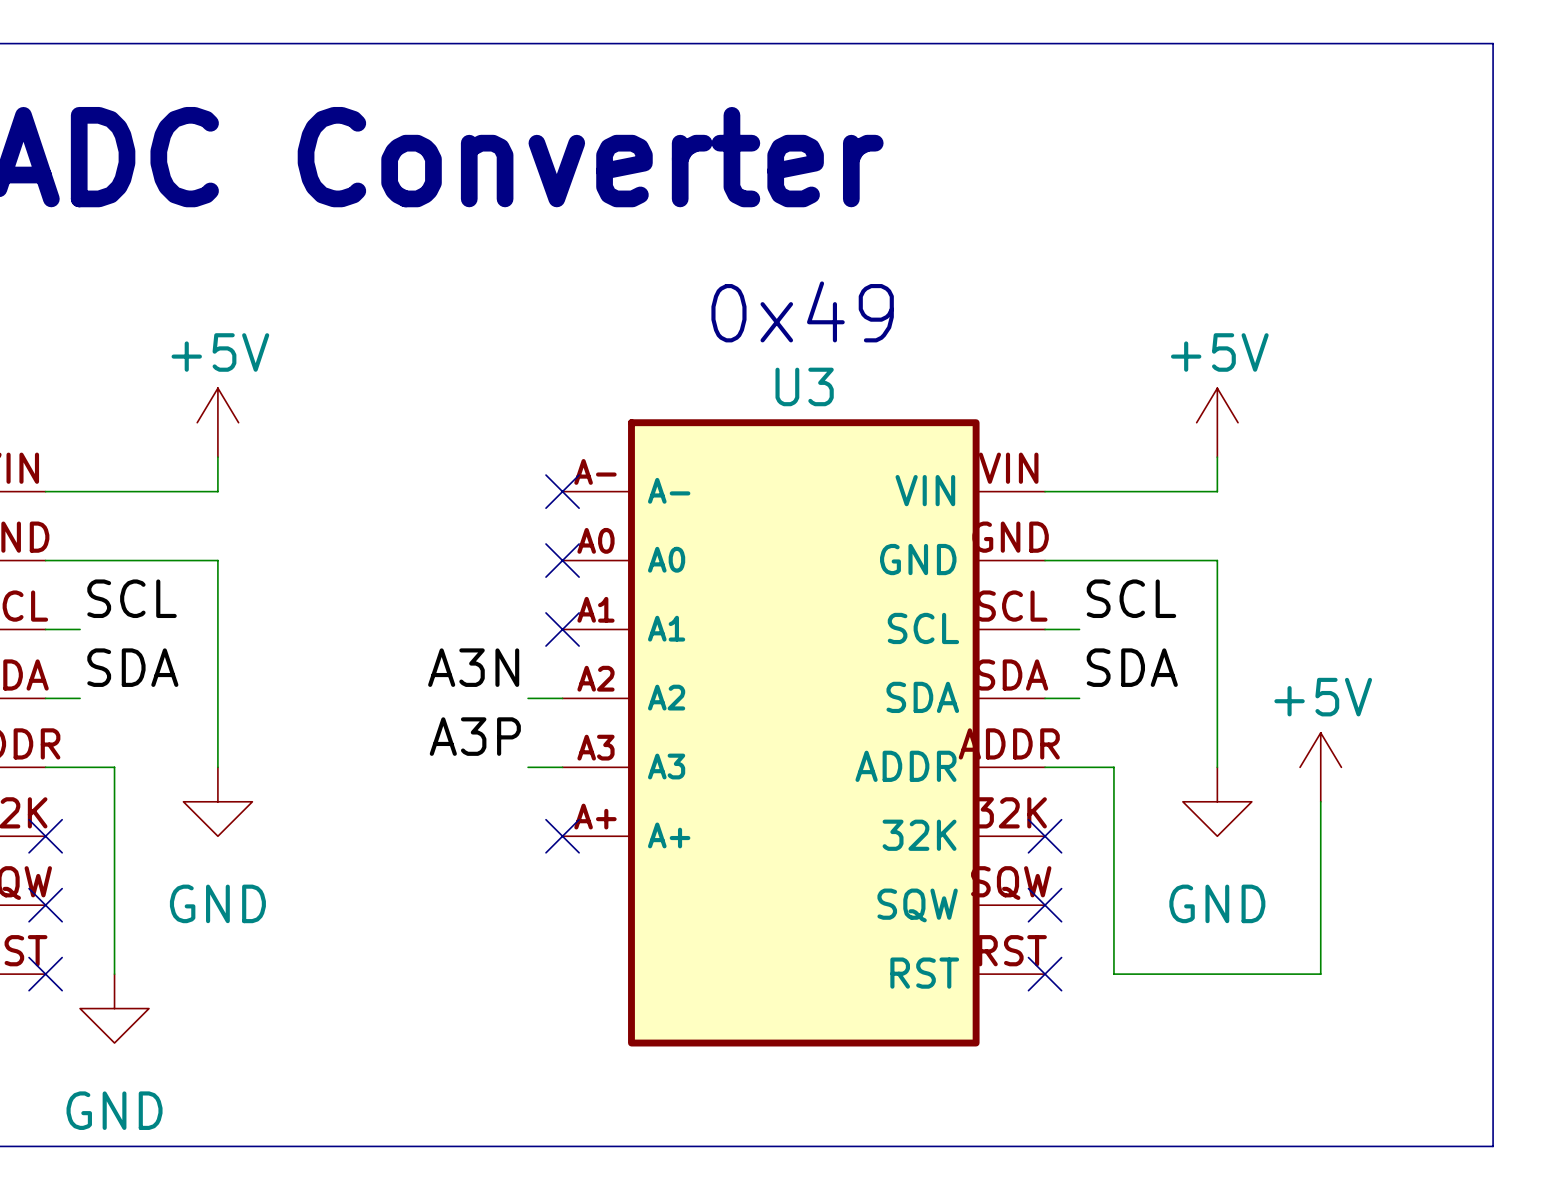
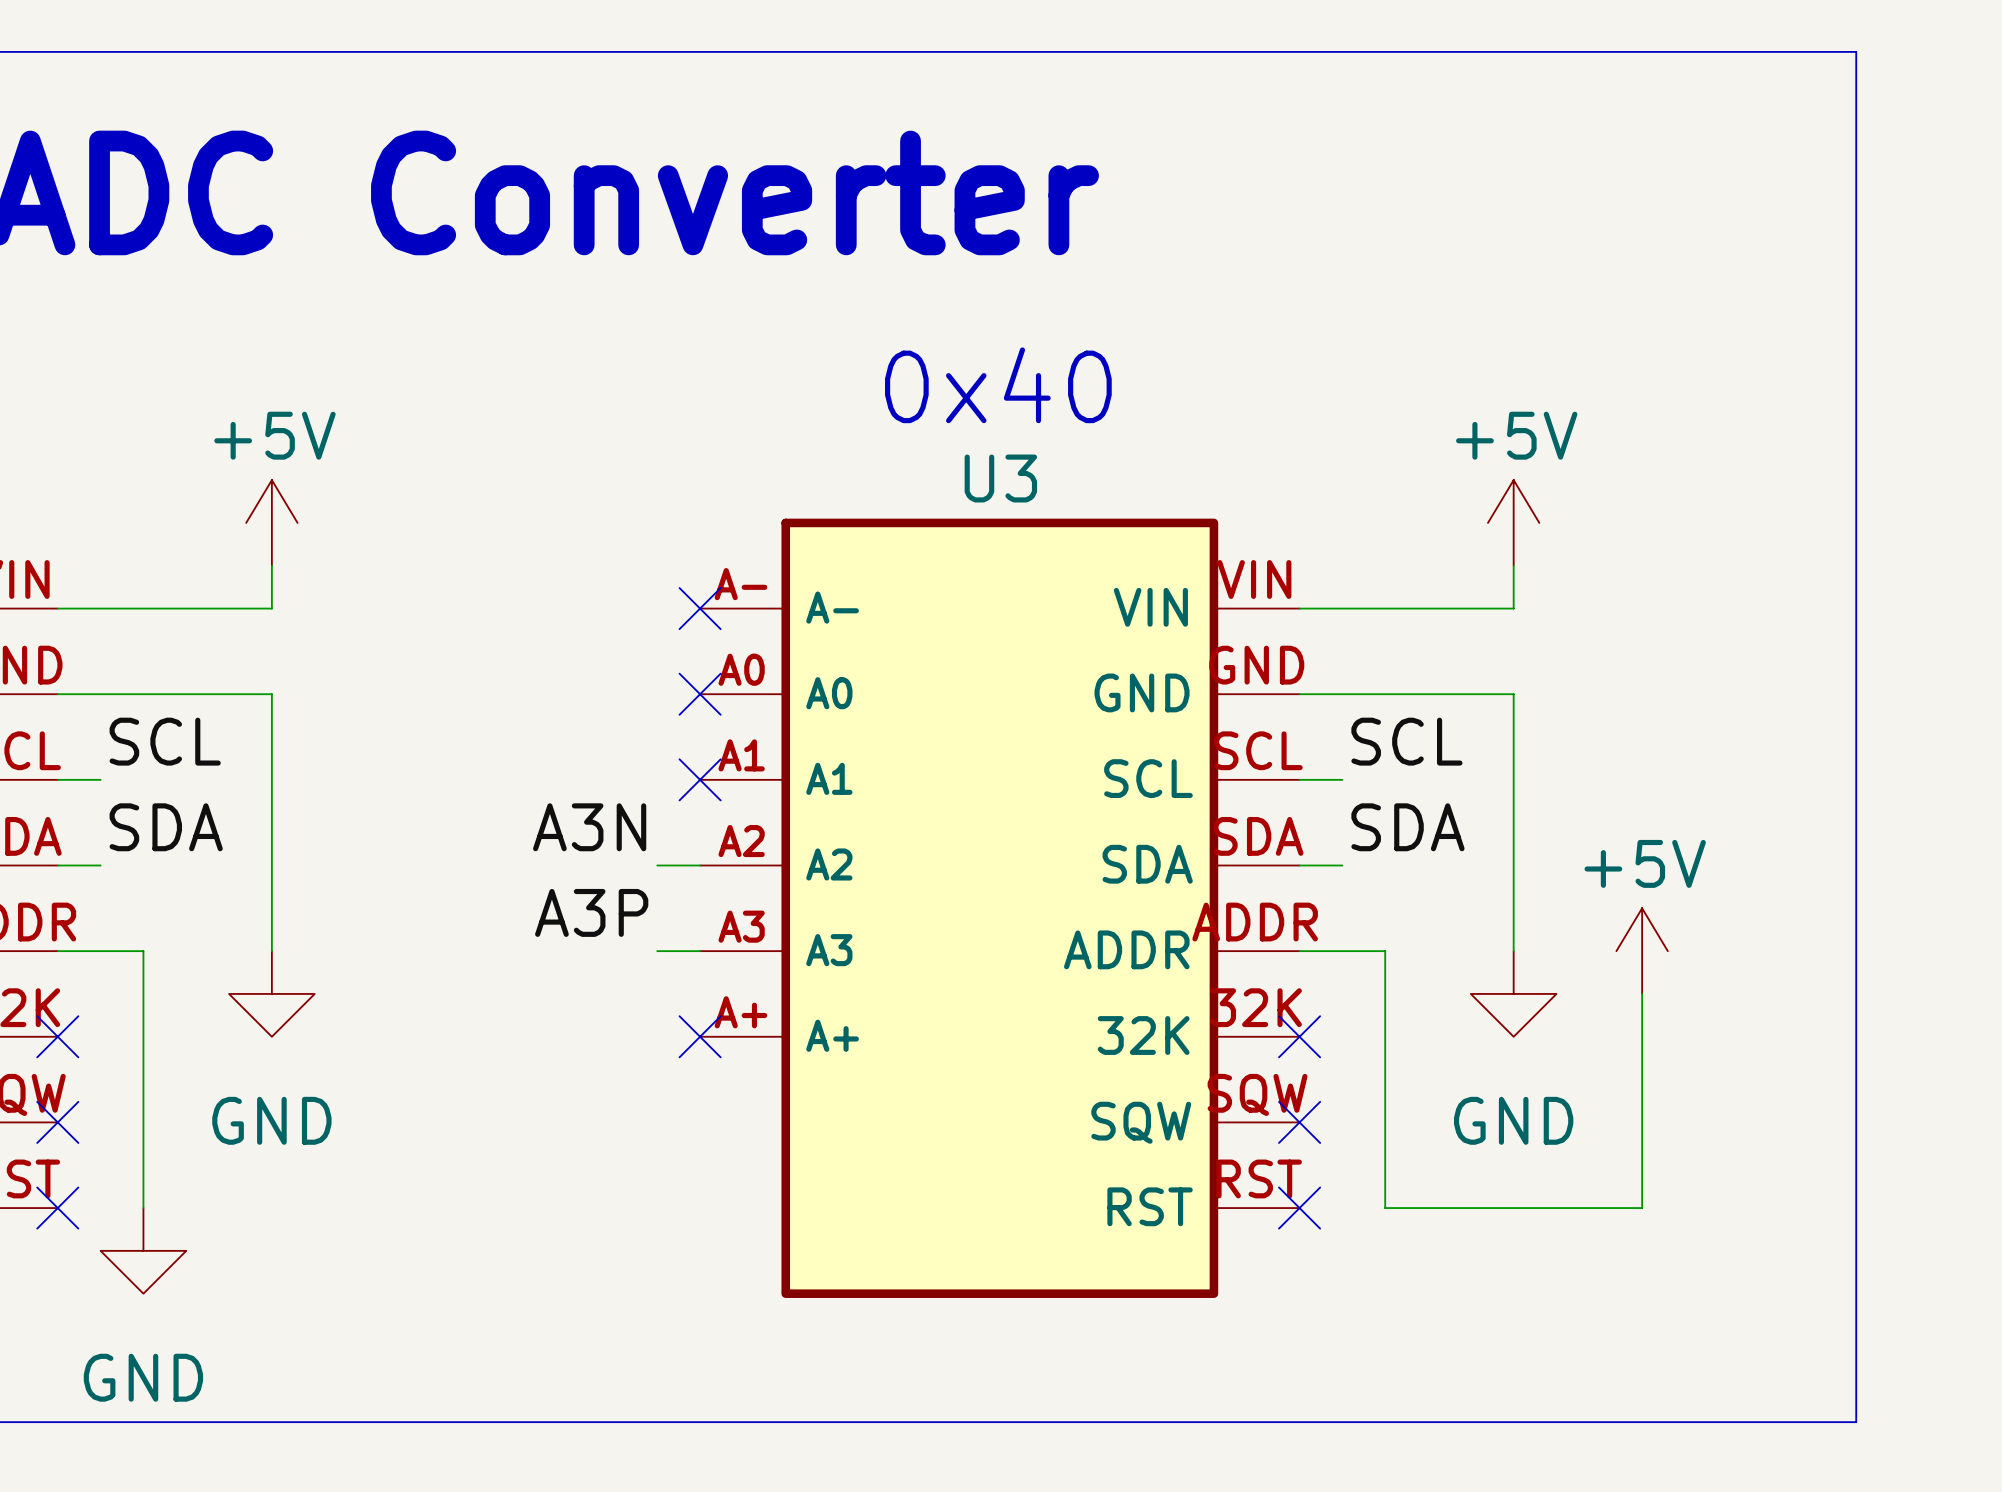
text: 0x49 (802, 311) -> 0x40 (998, 385)

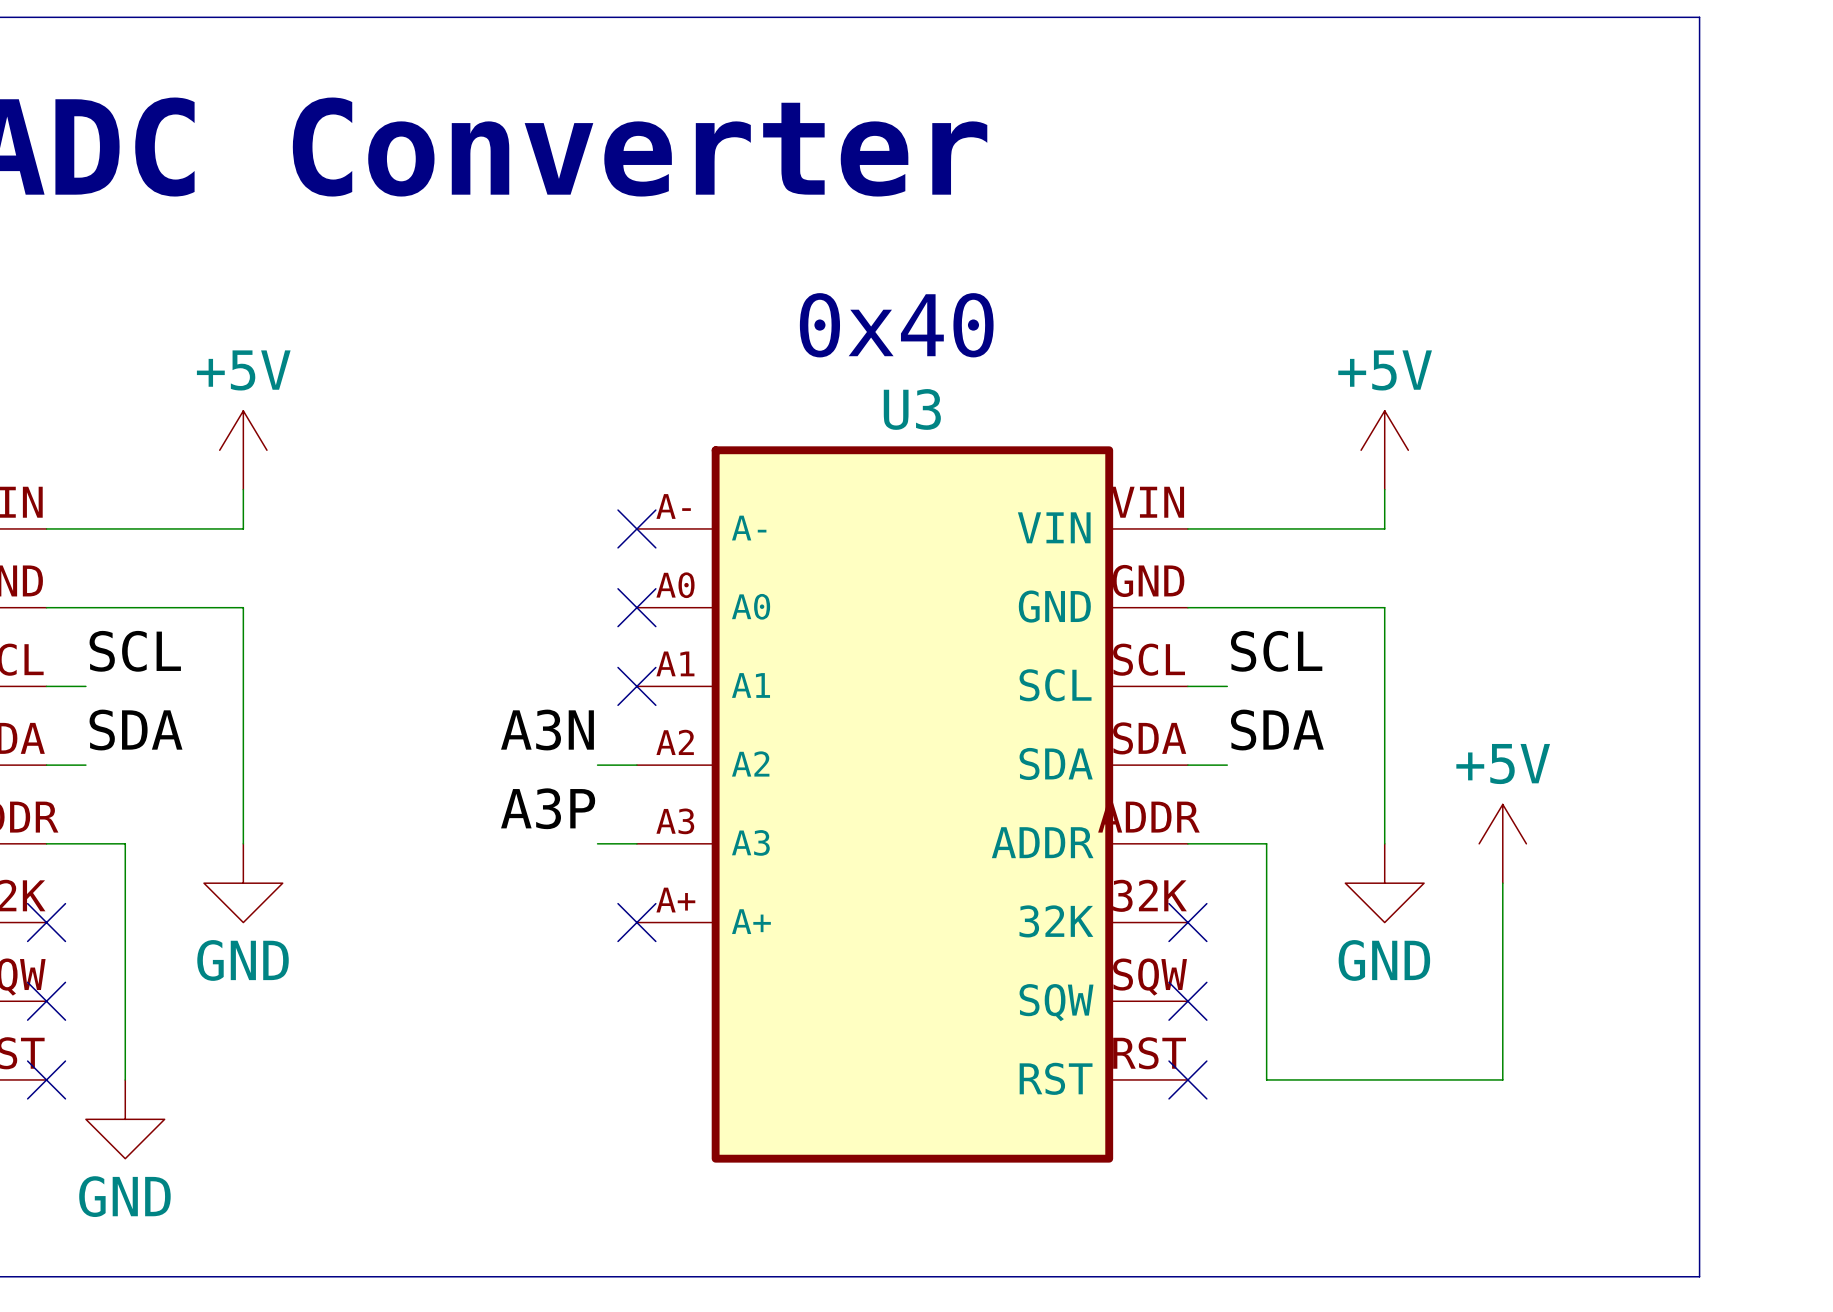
power symbol text position: GND (271, 1120) -> GND (243, 960)
power symbol text position: GND (1513, 1120) -> GND (1384, 960)
power symbol text position: GND (143, 1377) -> GND (124, 1196)

